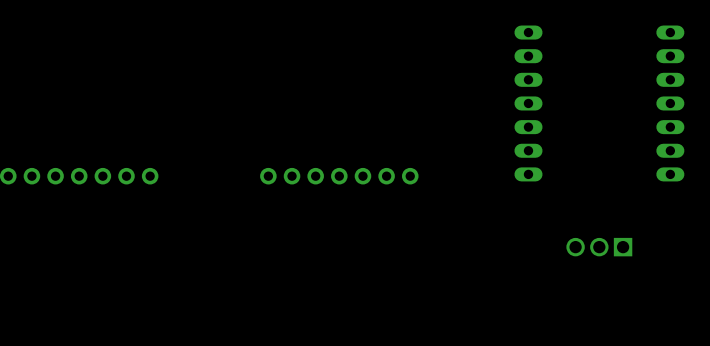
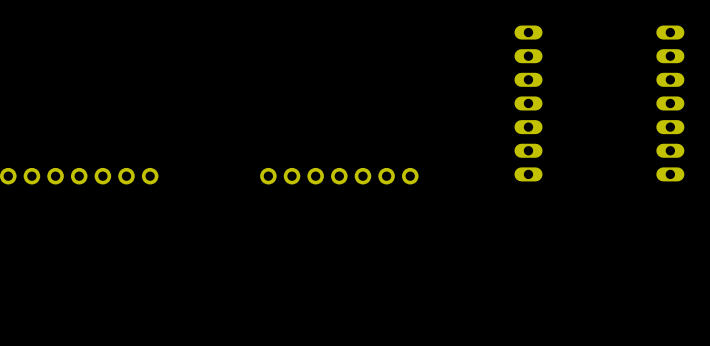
part: (599, 247) -> none

